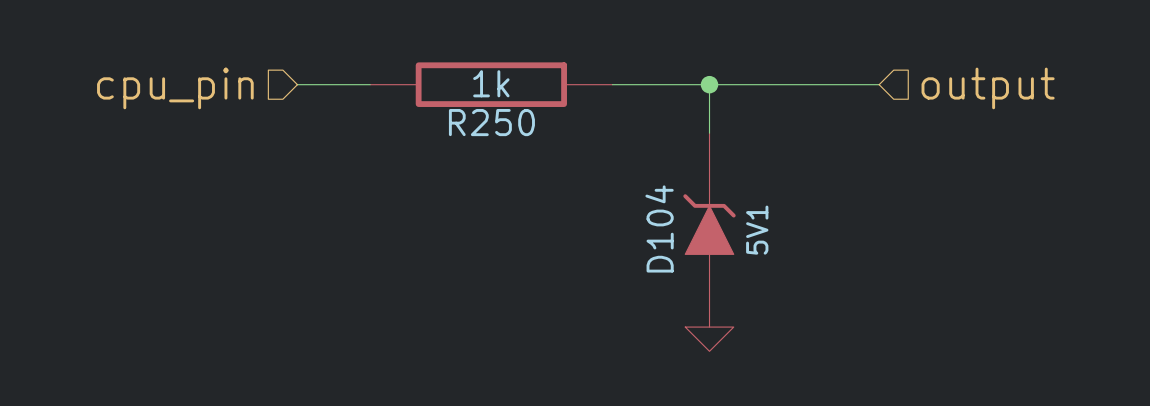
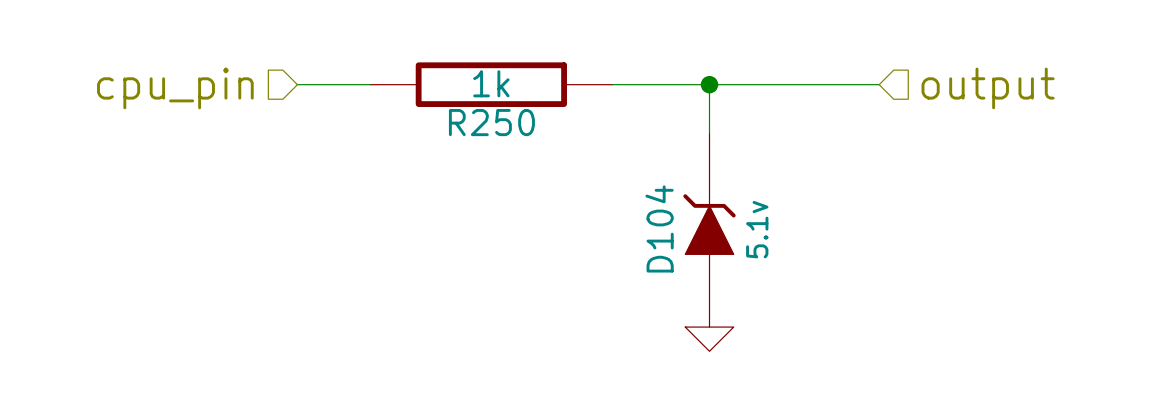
D104 value: 5V1 (757, 230) -> 5.1v (757, 229)

